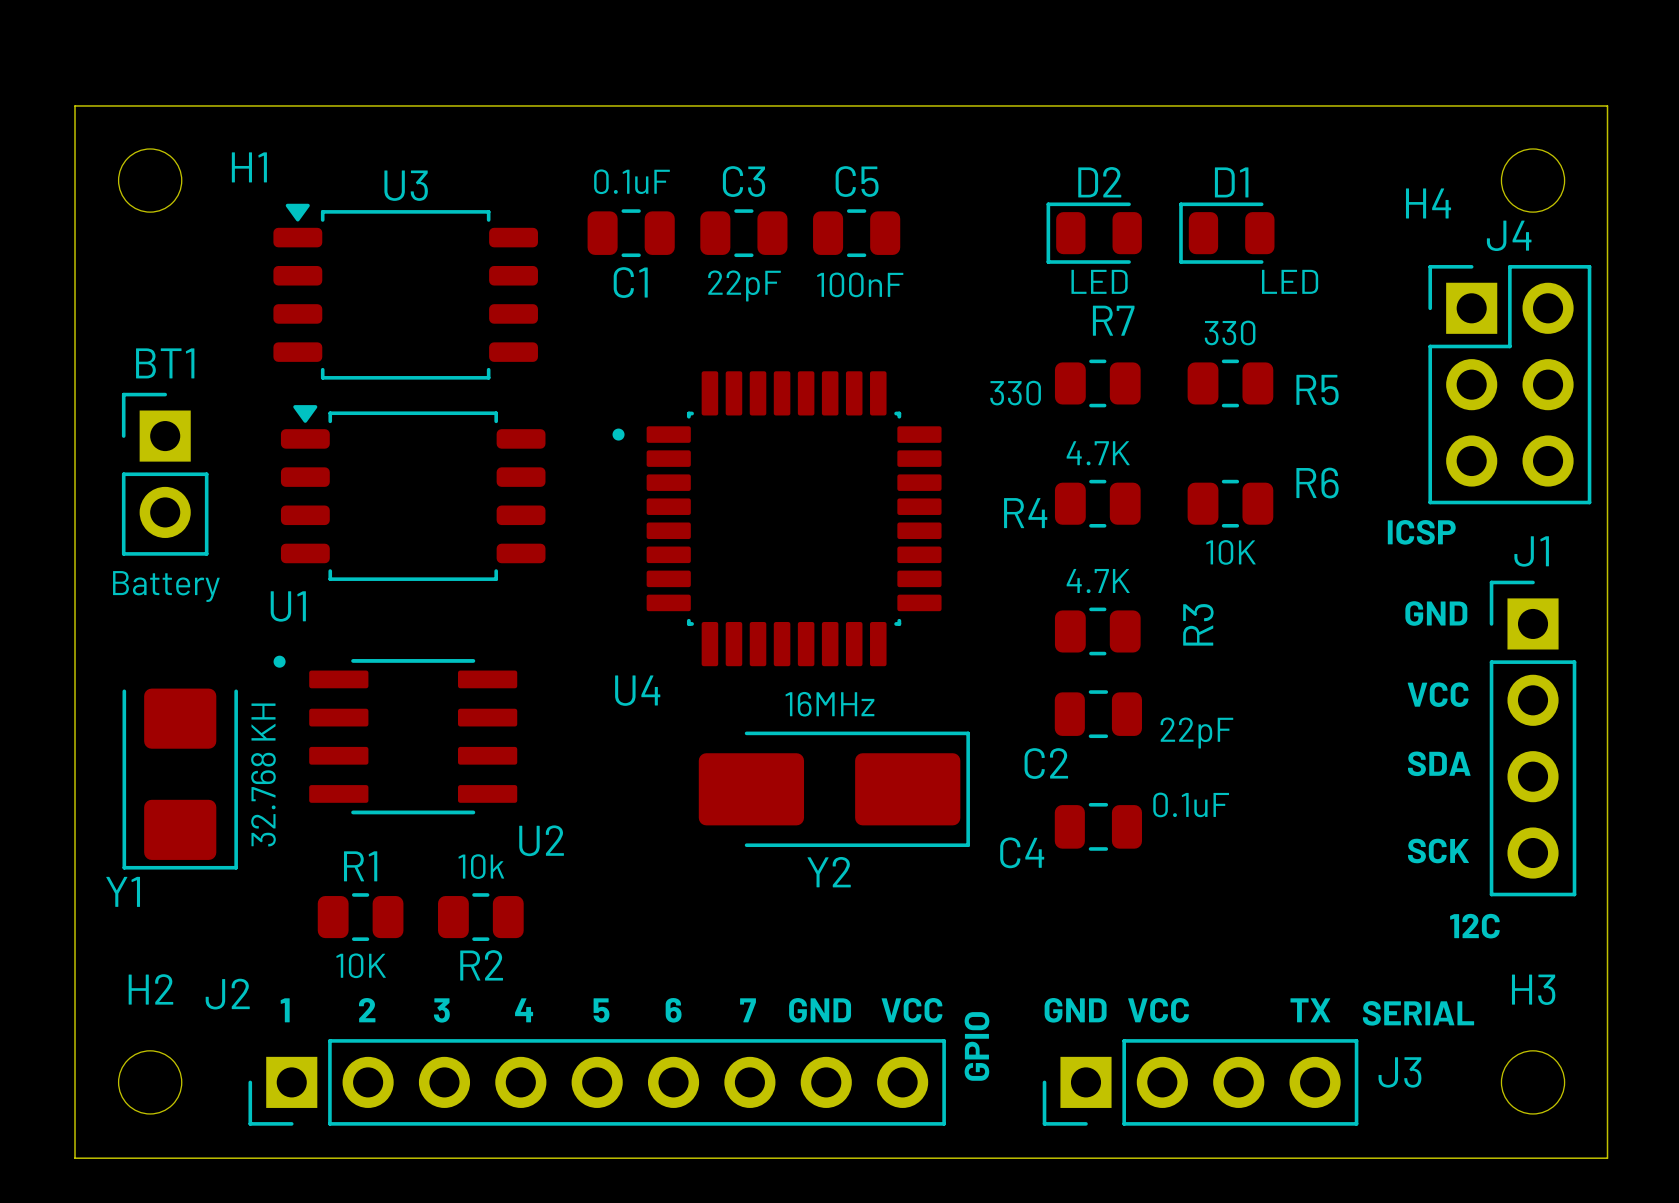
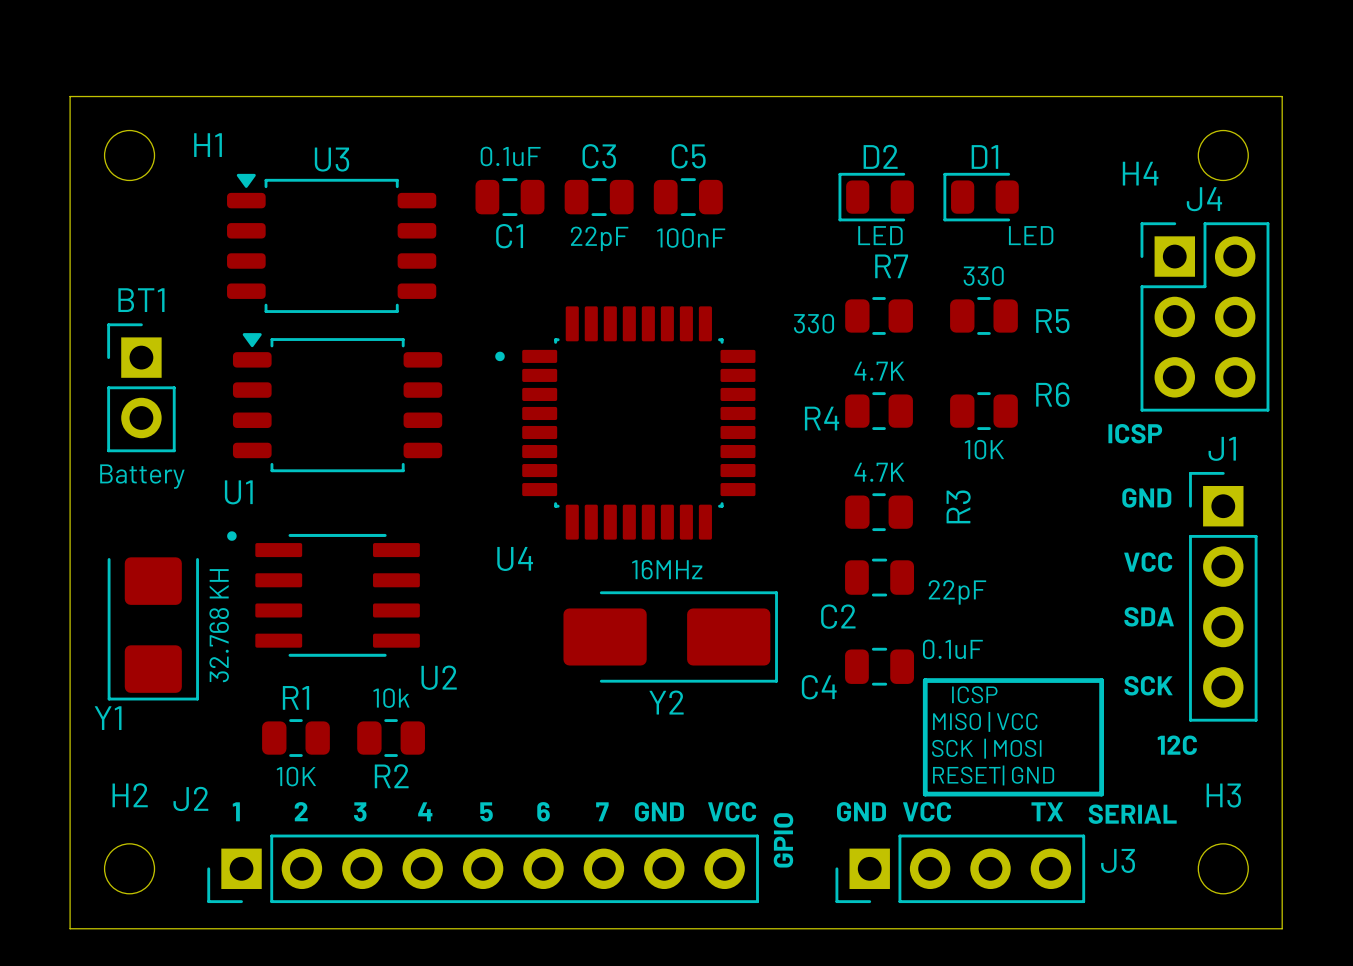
line: none -> (925, 680) (1101, 680) (1101, 794) (925, 794) (925, 680)
text: none -> ICSP (974, 694)
text: none -> MISO | VCC (985, 721)
text: none -> SCK | MOSI (986, 748)
text: none -> RESET| GND (993, 775)

